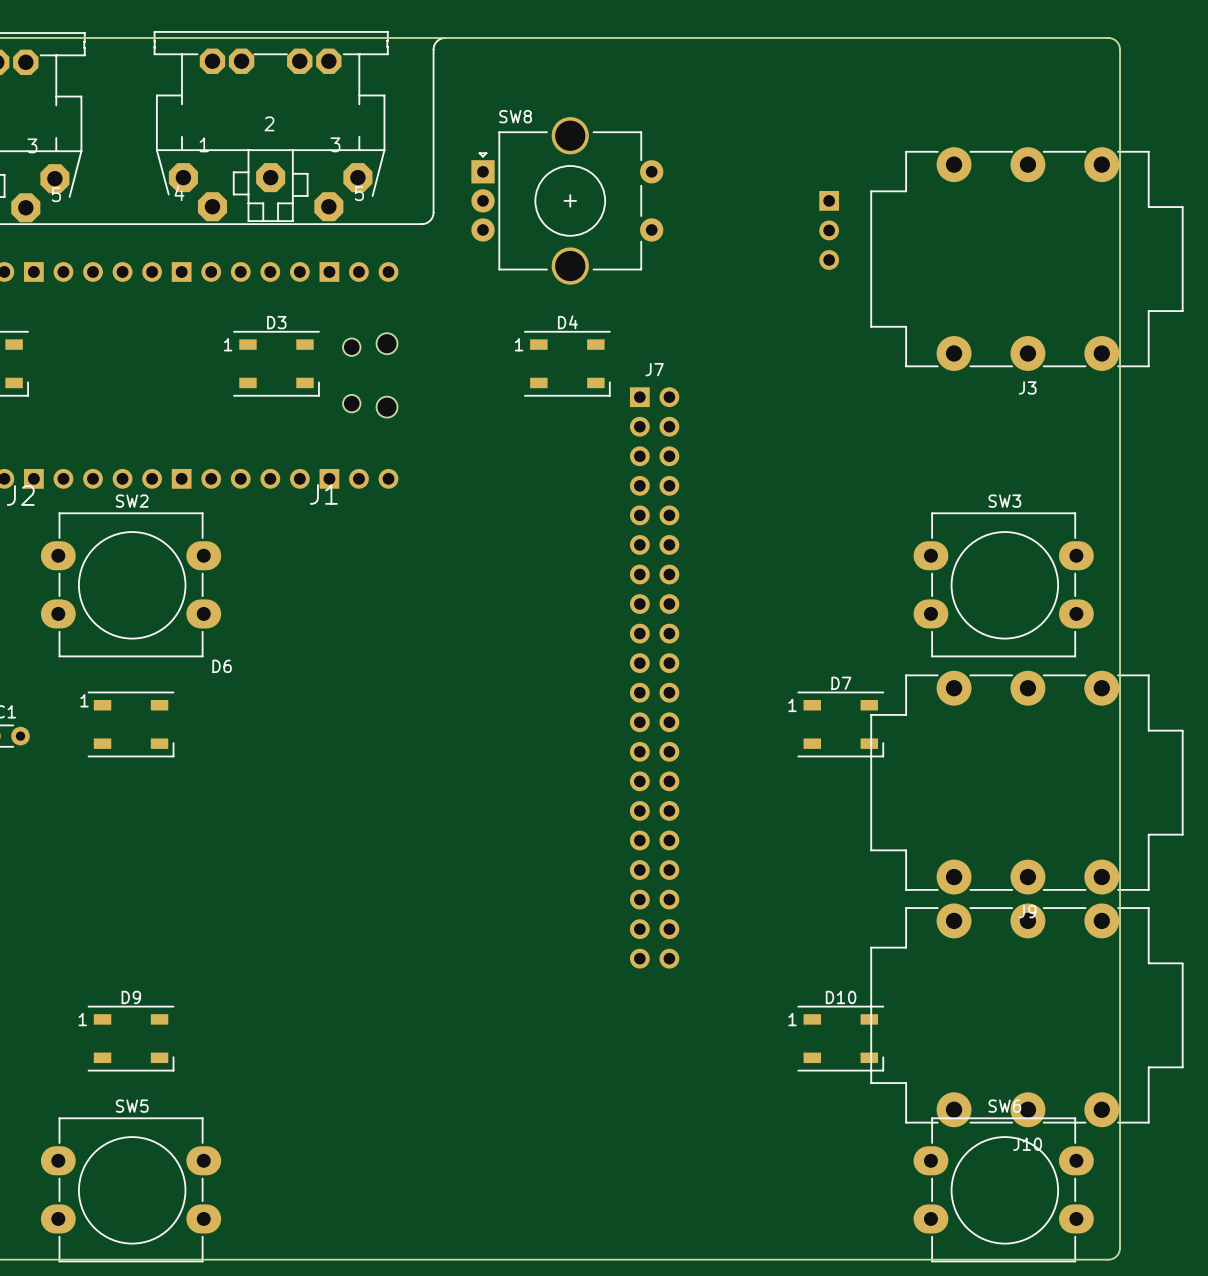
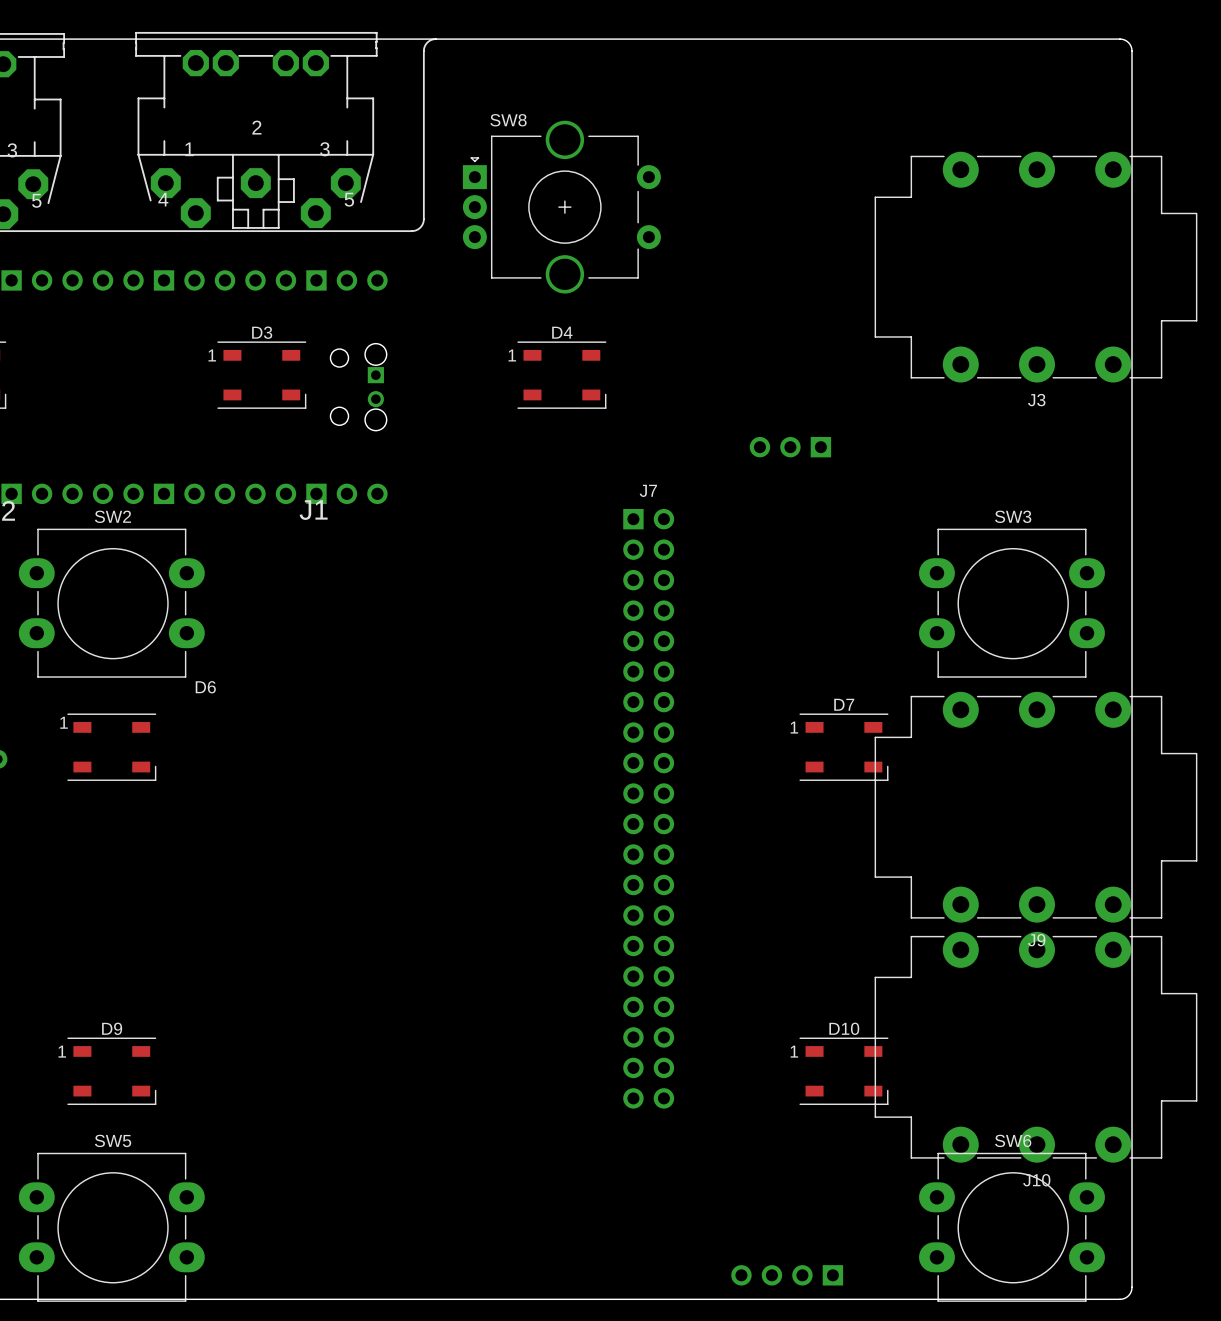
part rotation: 0° (829, 230) -> 90° clockwise (790, 447)
part position: (829, 230) -> (790, 447)
part: none -> (375, 387)
J7 position: (654, 677) -> (648, 808)
part: none -> (787, 1275)

